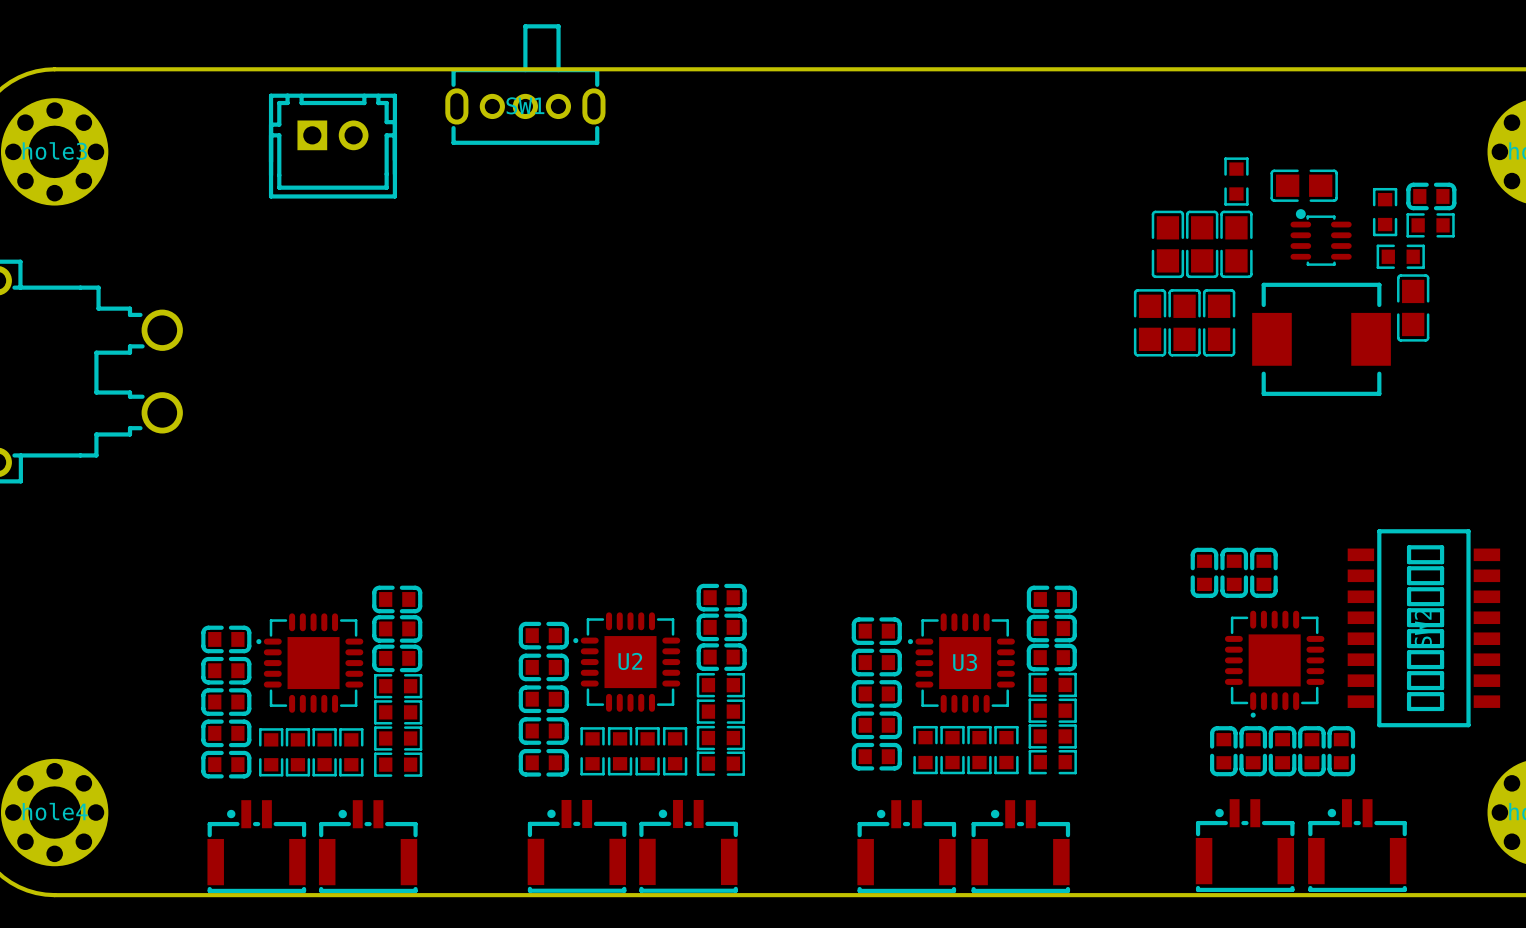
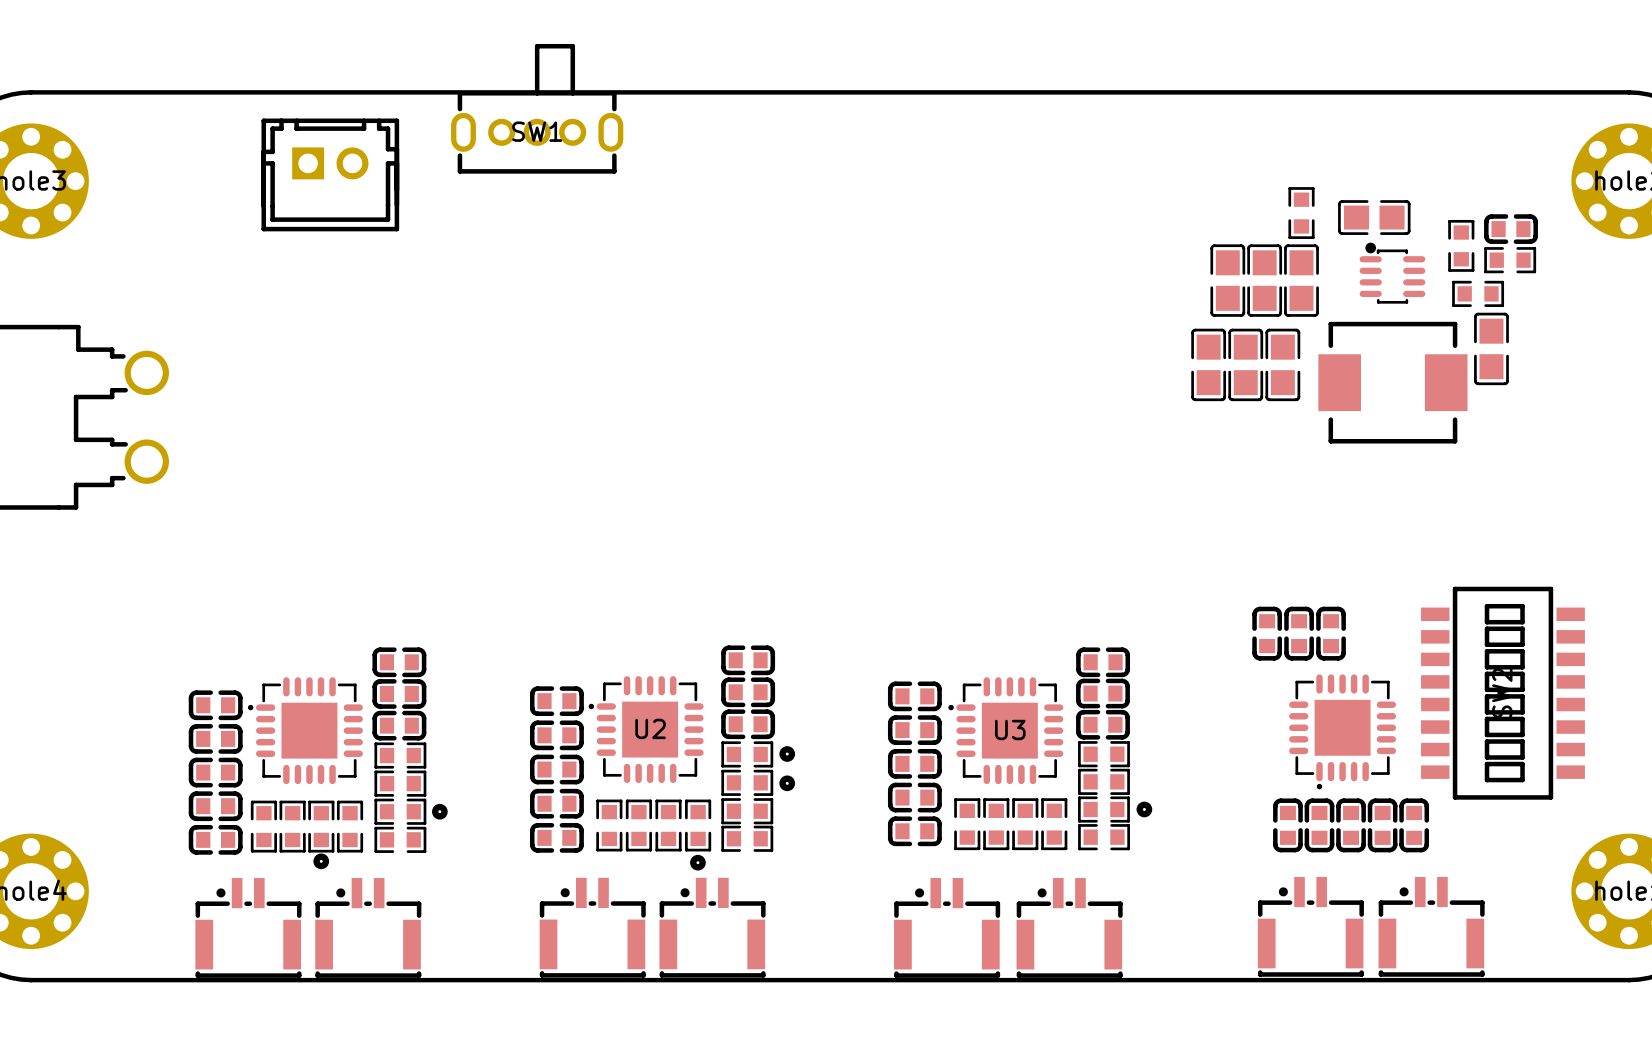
drawing: none -> [779, 746, 796, 792]
drawing: none -> [1136, 801, 1153, 818]
drawing: none -> [432, 803, 448, 820]
drawing: none -> [313, 853, 330, 870]
drawing: none -> [690, 854, 706, 871]

